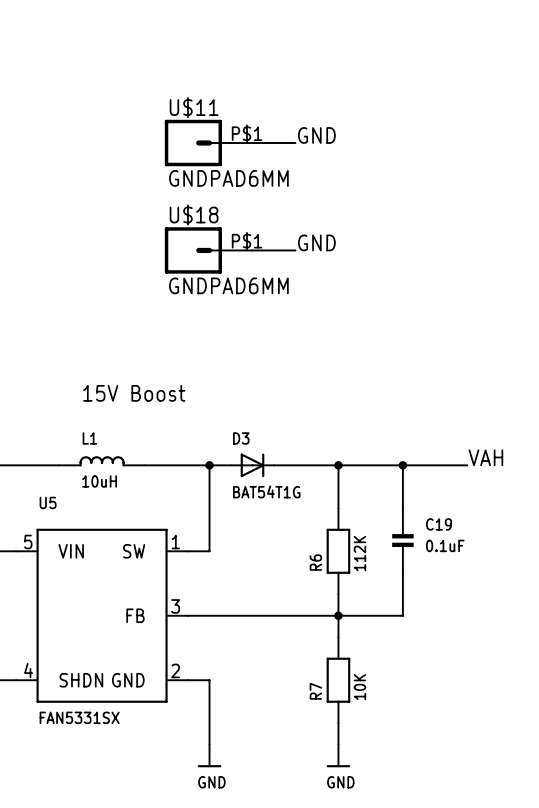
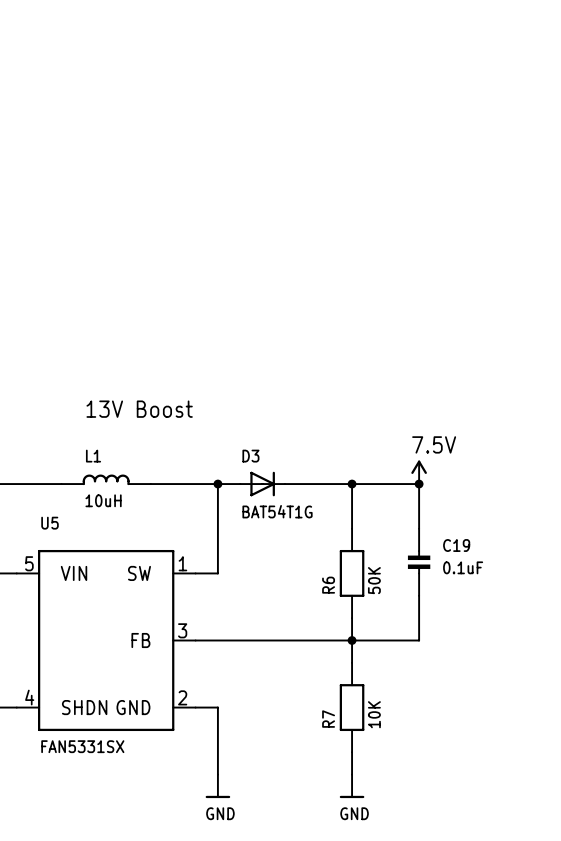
label: GND (316, 135) -> none
U$11: GNDPAD6MM (208, 143) -> none
wire: (252, 143) (295, 143) -> none
label: GND (316, 242) -> none
U$18: GNDPAD6MM (208, 250) -> none
wire: (252, 250) (295, 250) -> none
text: 15V Boost (134, 393) -> 13V Boost (139, 409)
power symbol: none -> 7.5V (419, 472)
label: VAH (485, 457) -> none
wire: (402, 465) (467, 465) -> none
R6 value: 112K (359, 553) -> 50K (374, 580)

